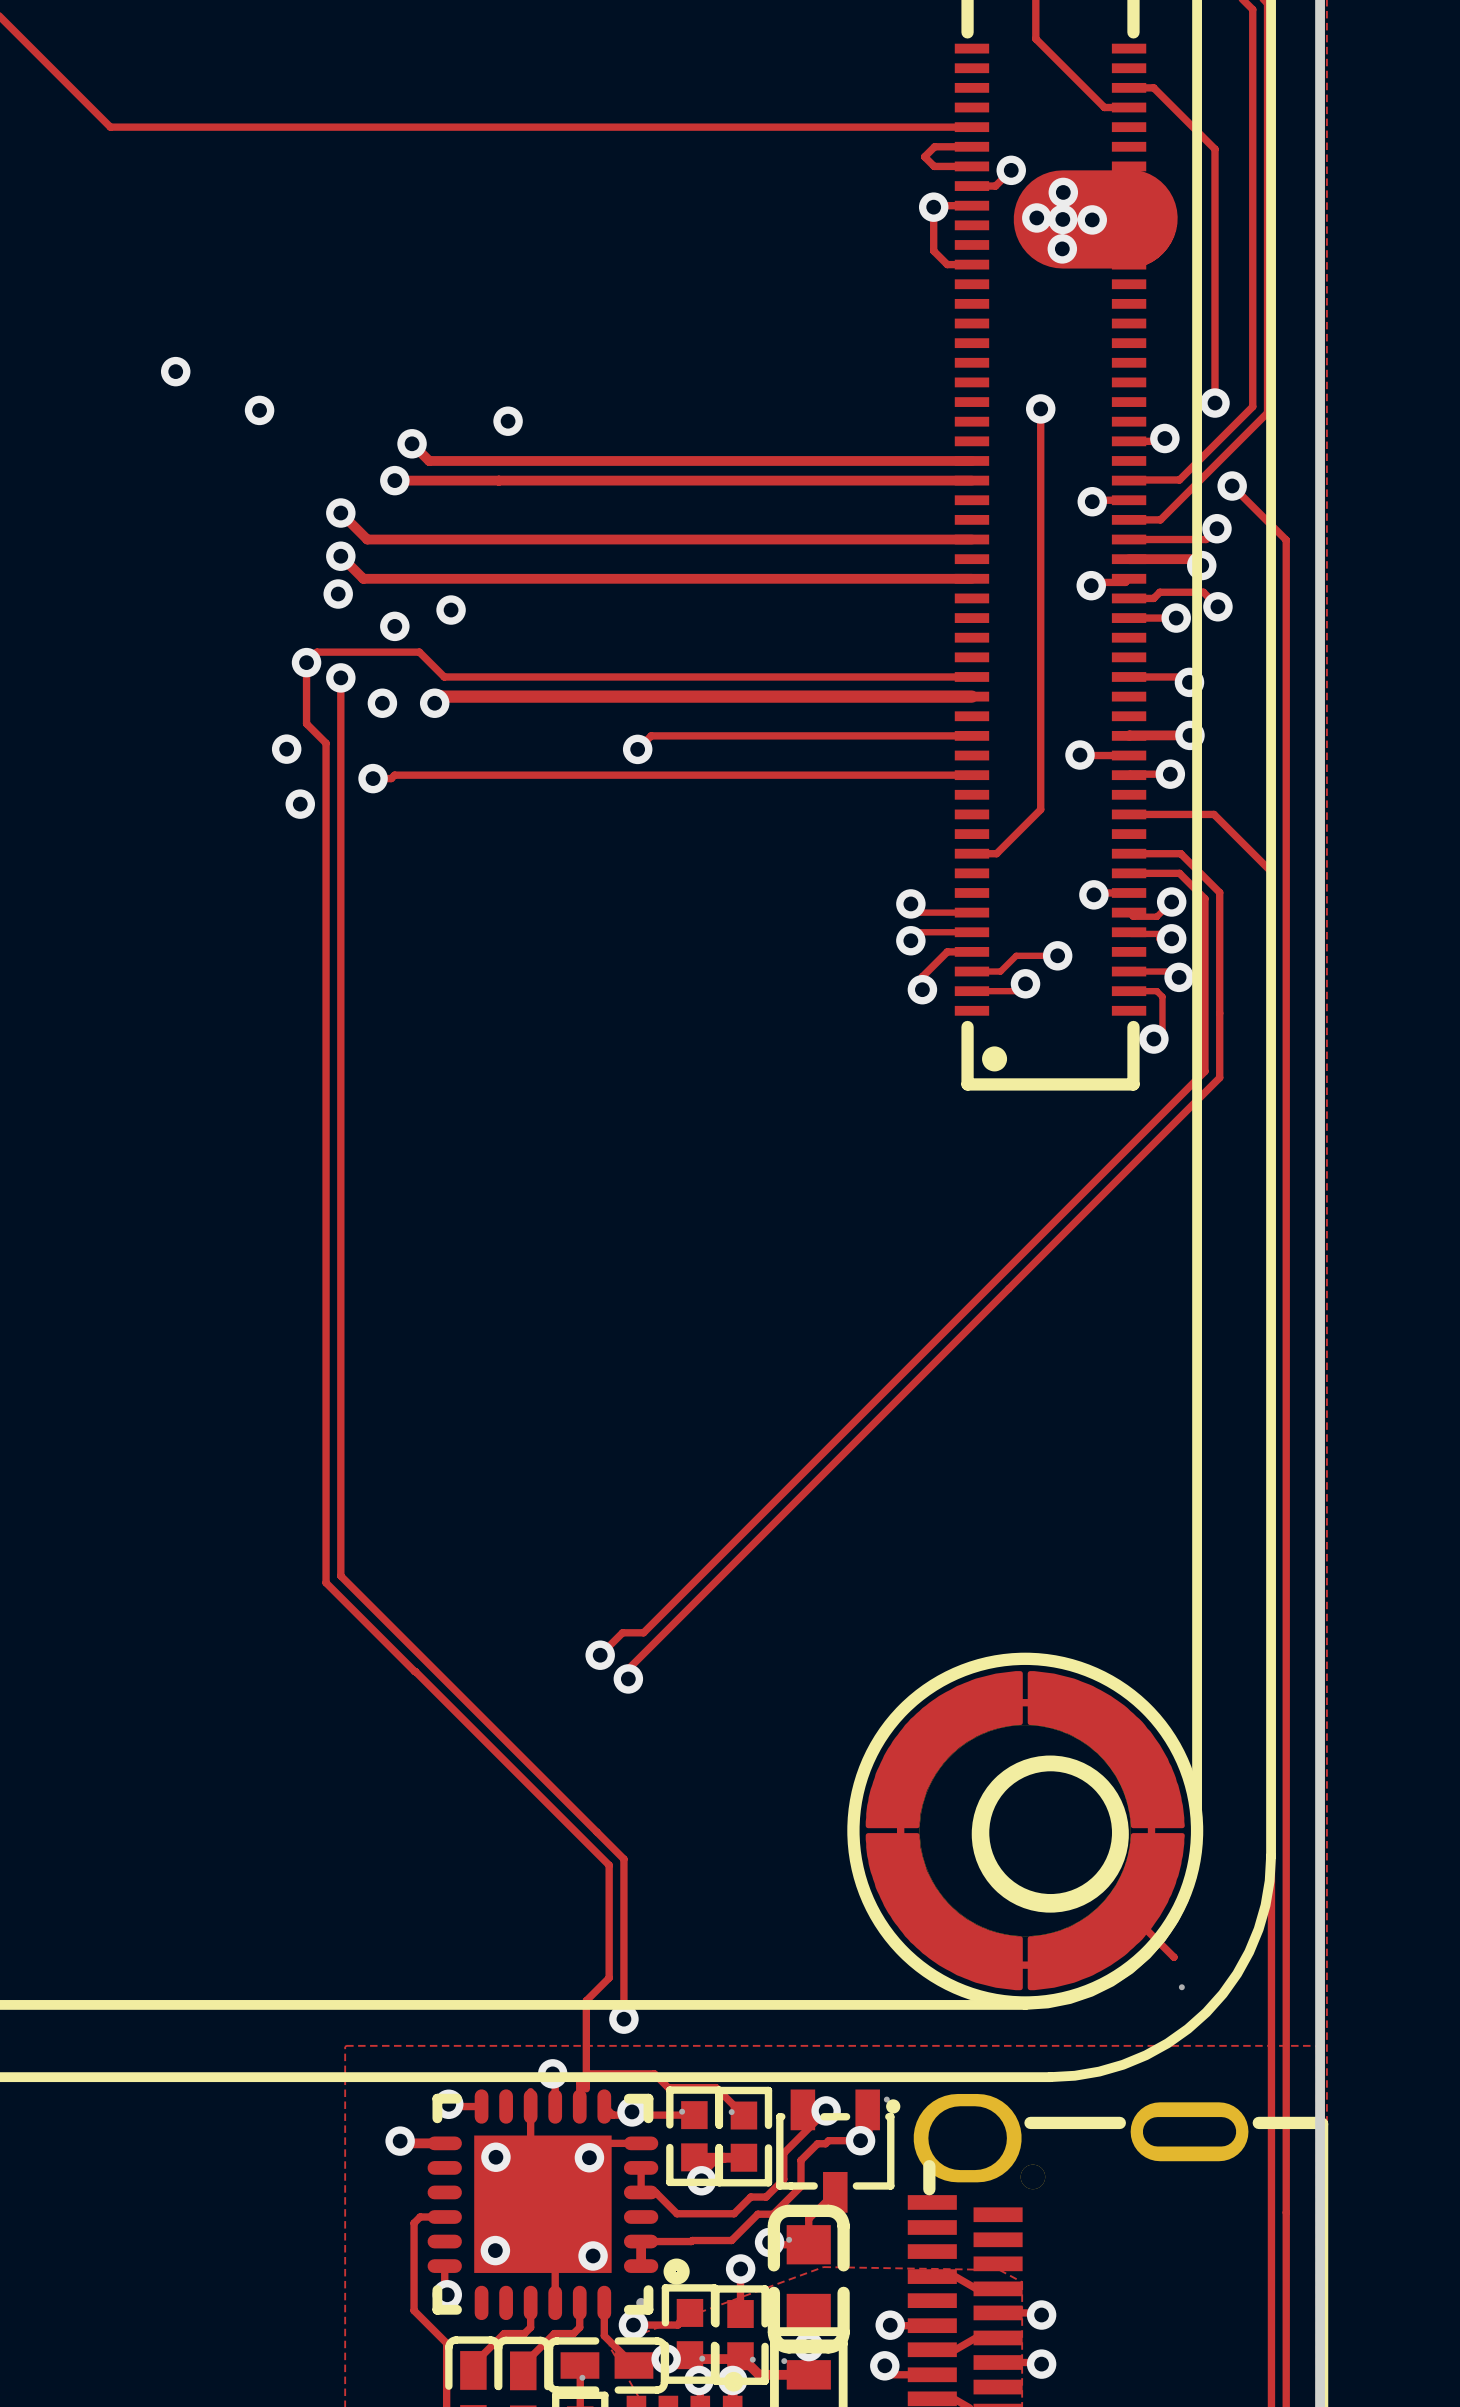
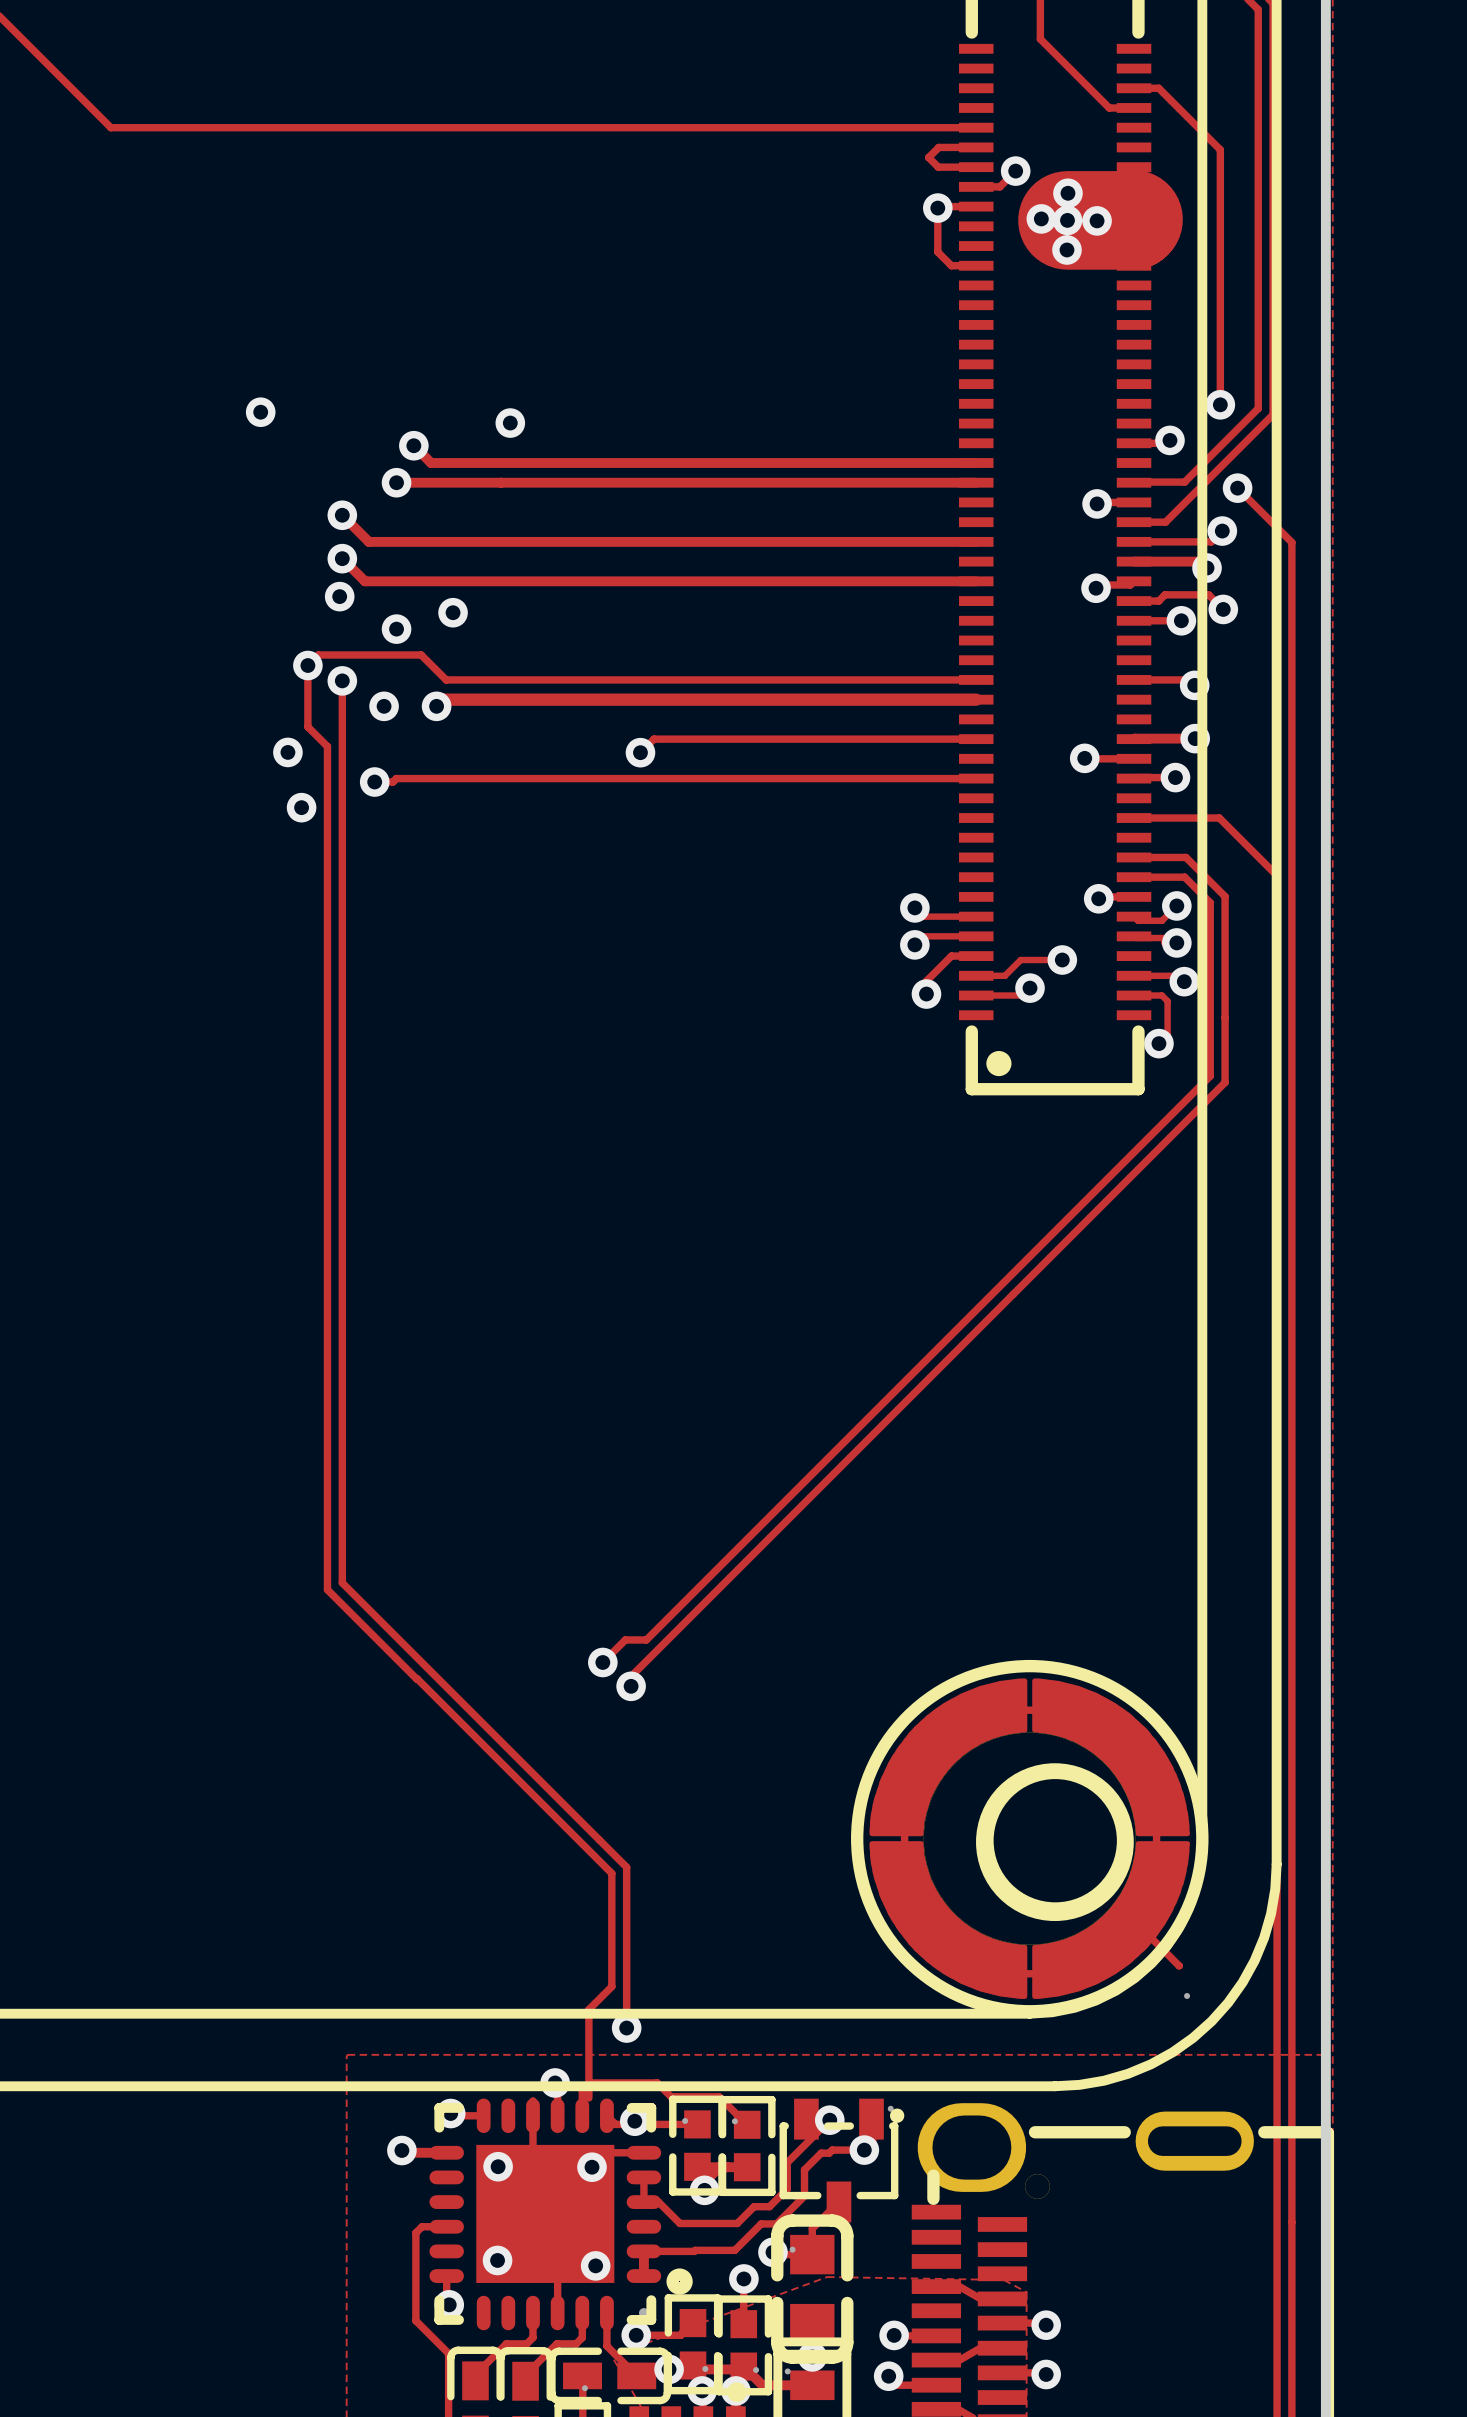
via: (175, 371) -> none
track: (1040, 408) (1040, 809) (996, 853) (971, 853) -> none
via: (1040, 408) -> none

